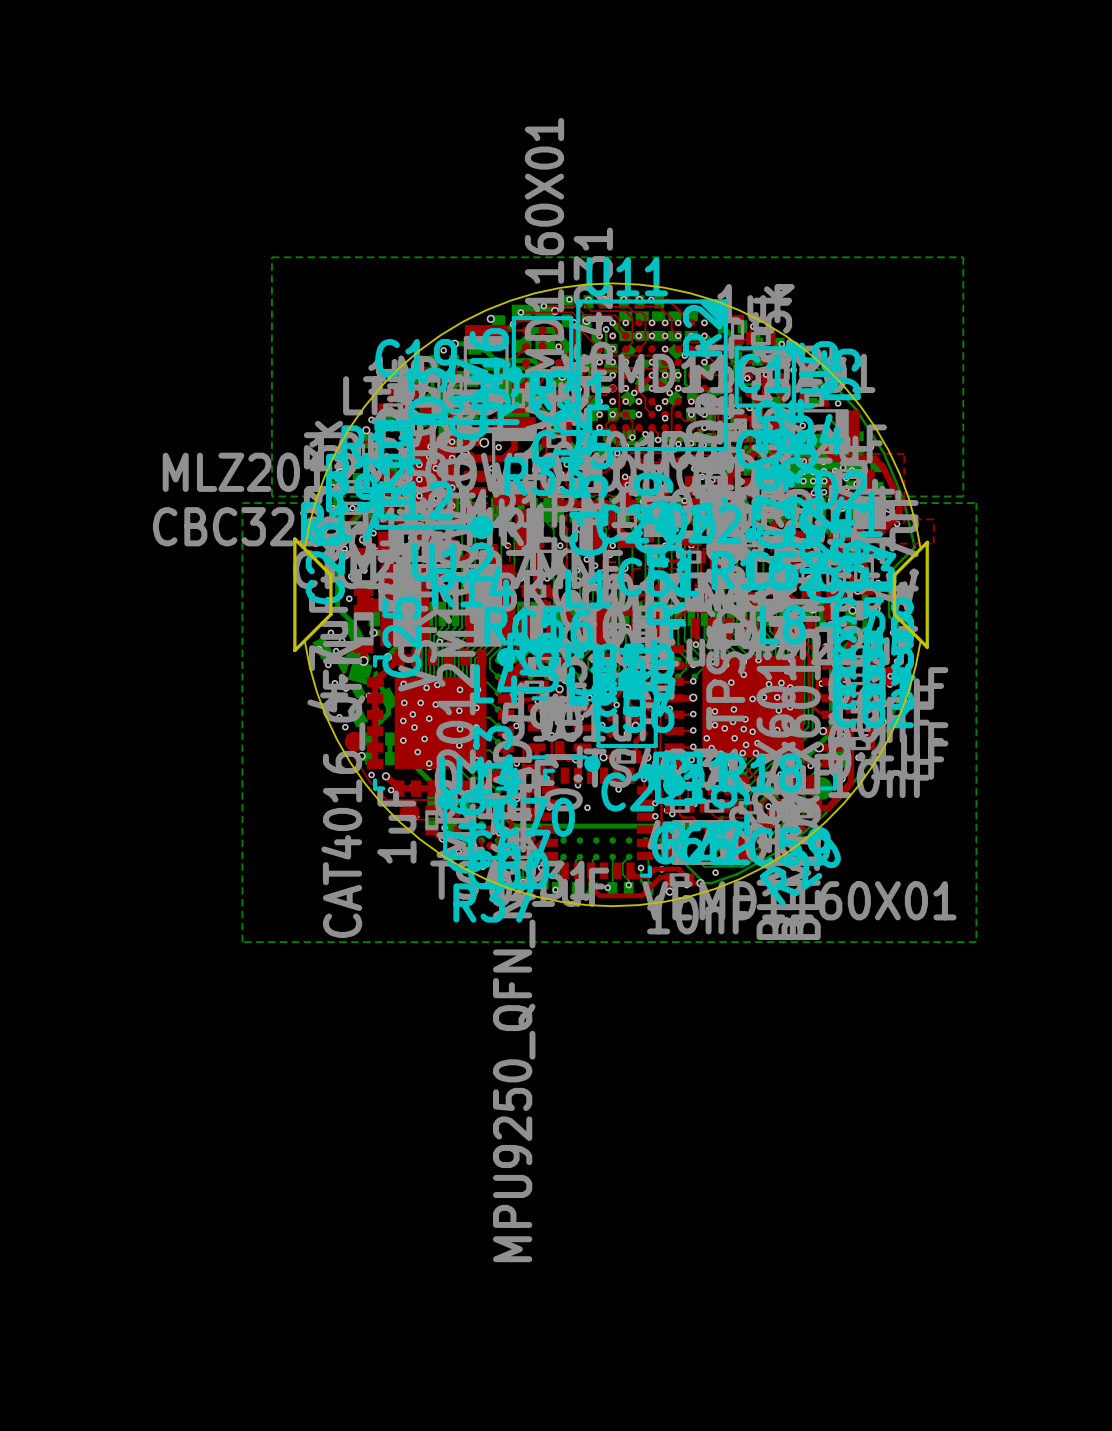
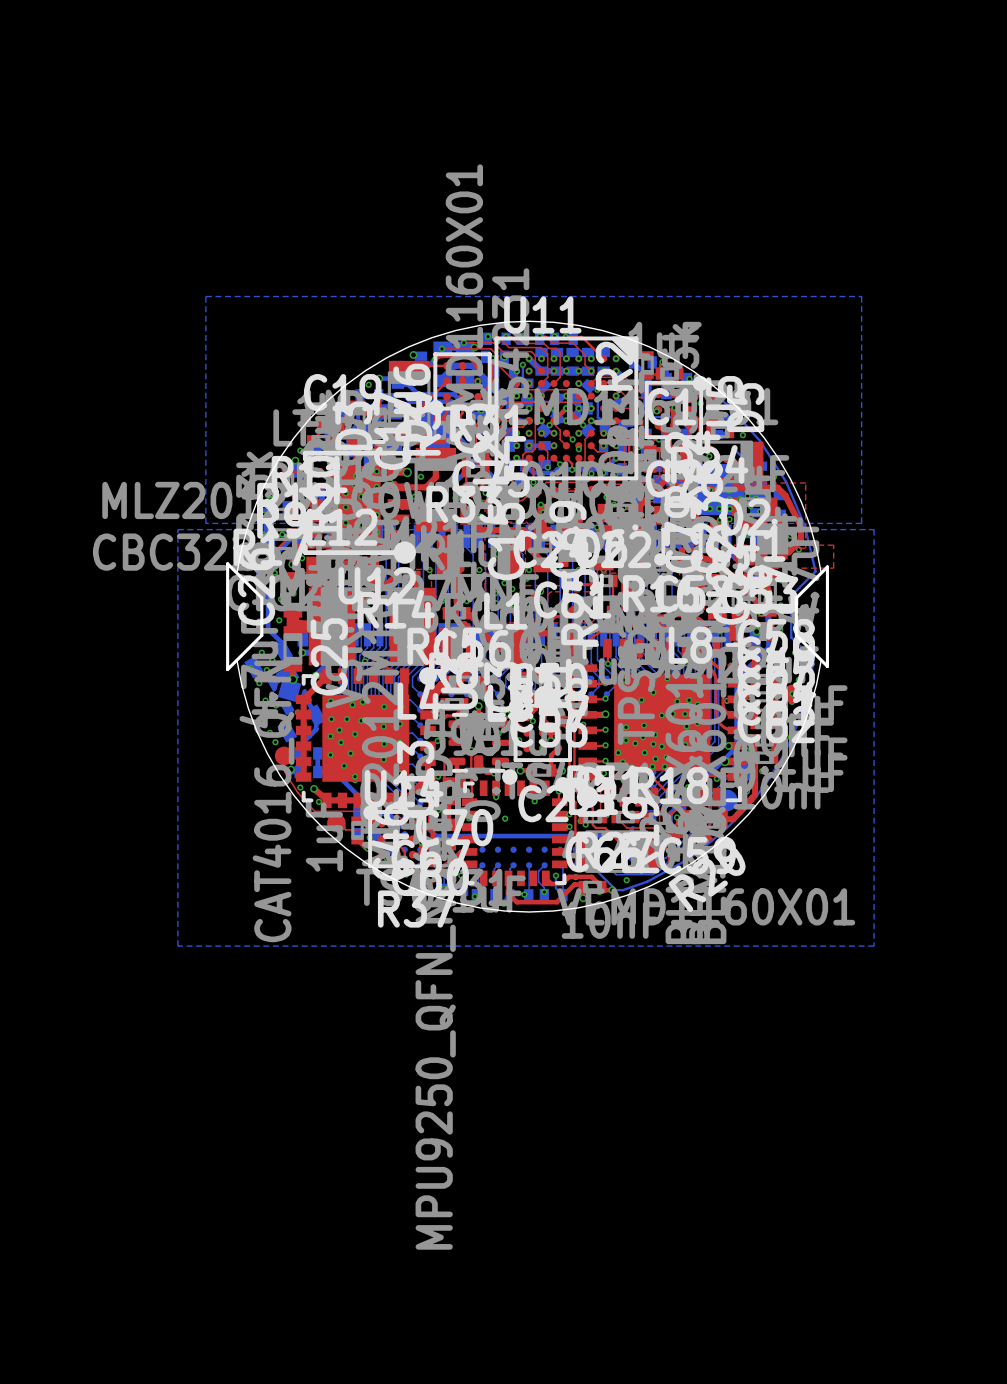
via: none -> (553, 358)

